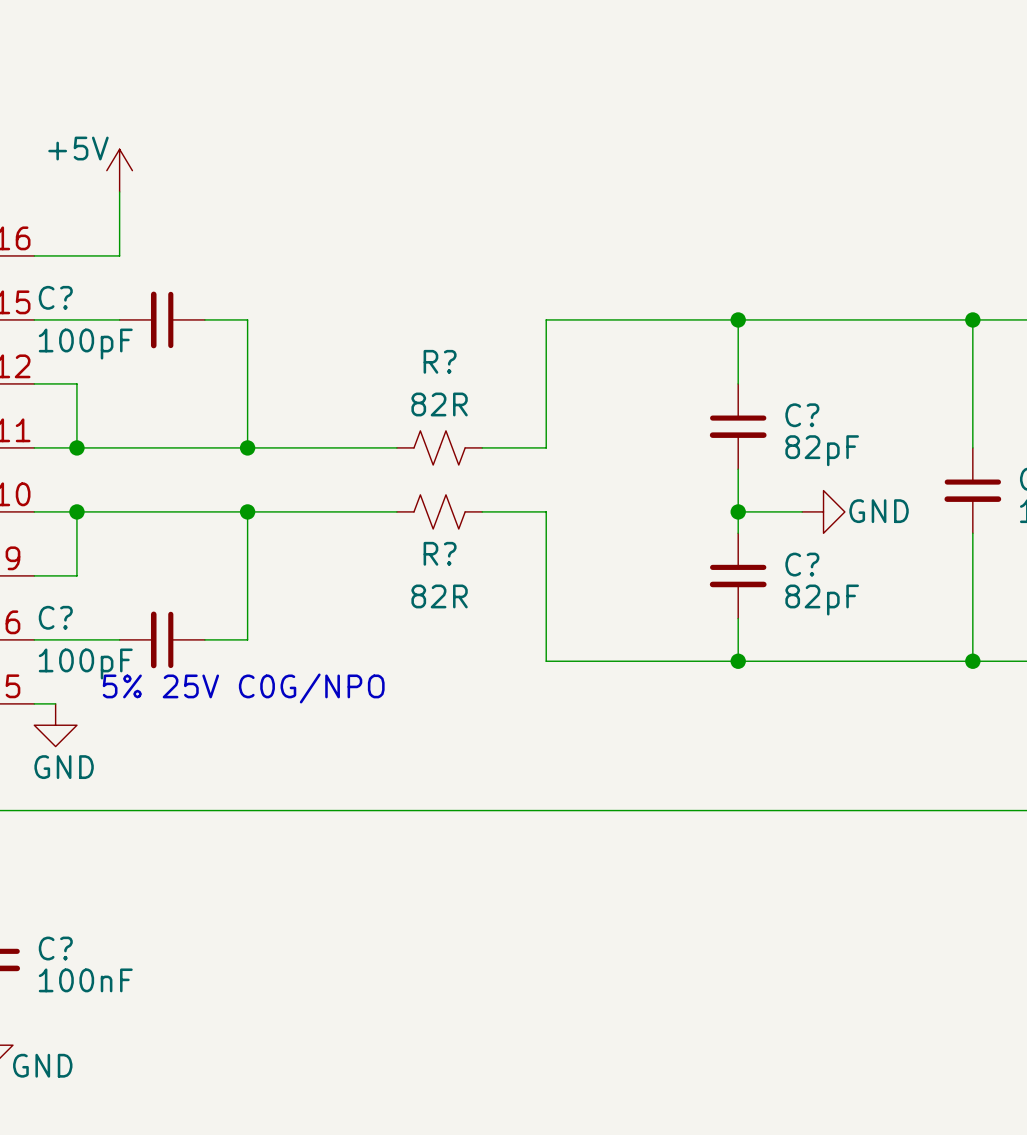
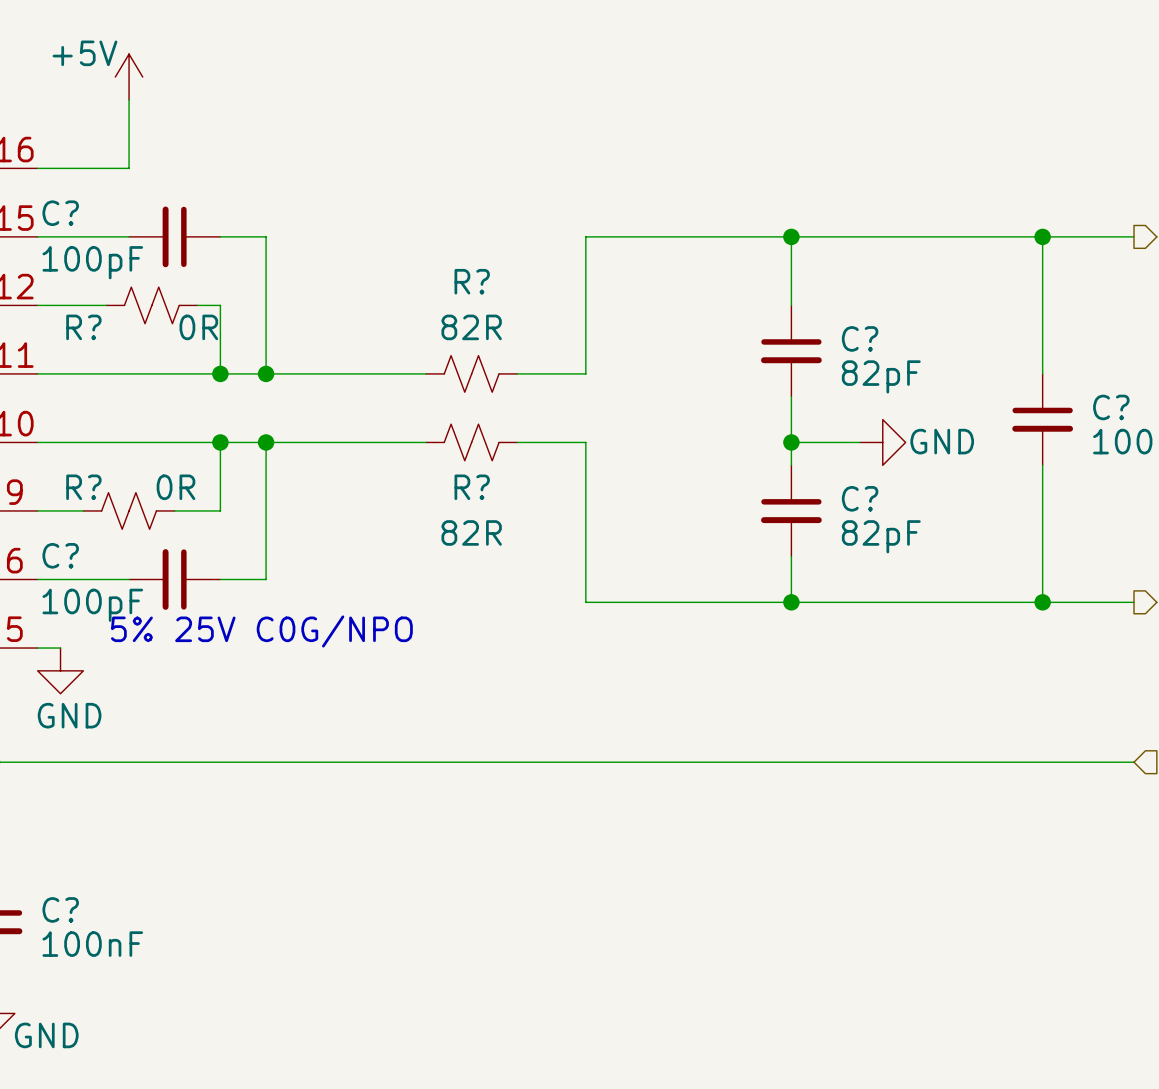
wire: (76, 383) (76, 447) -> (83, 305) (106, 305)
R?: none -> 0R (151, 305)
wire: none -> (197, 305) (220, 305) (220, 373)
junction: (76, 447) -> none
junction: none -> (220, 373)
wire: (76, 511) (76, 575) -> none
junction: (76, 511) -> none
wire: none -> (220, 442) (220, 510) (174, 510)
junction: none -> (220, 442)
R?: none -> 0R (129, 510)

